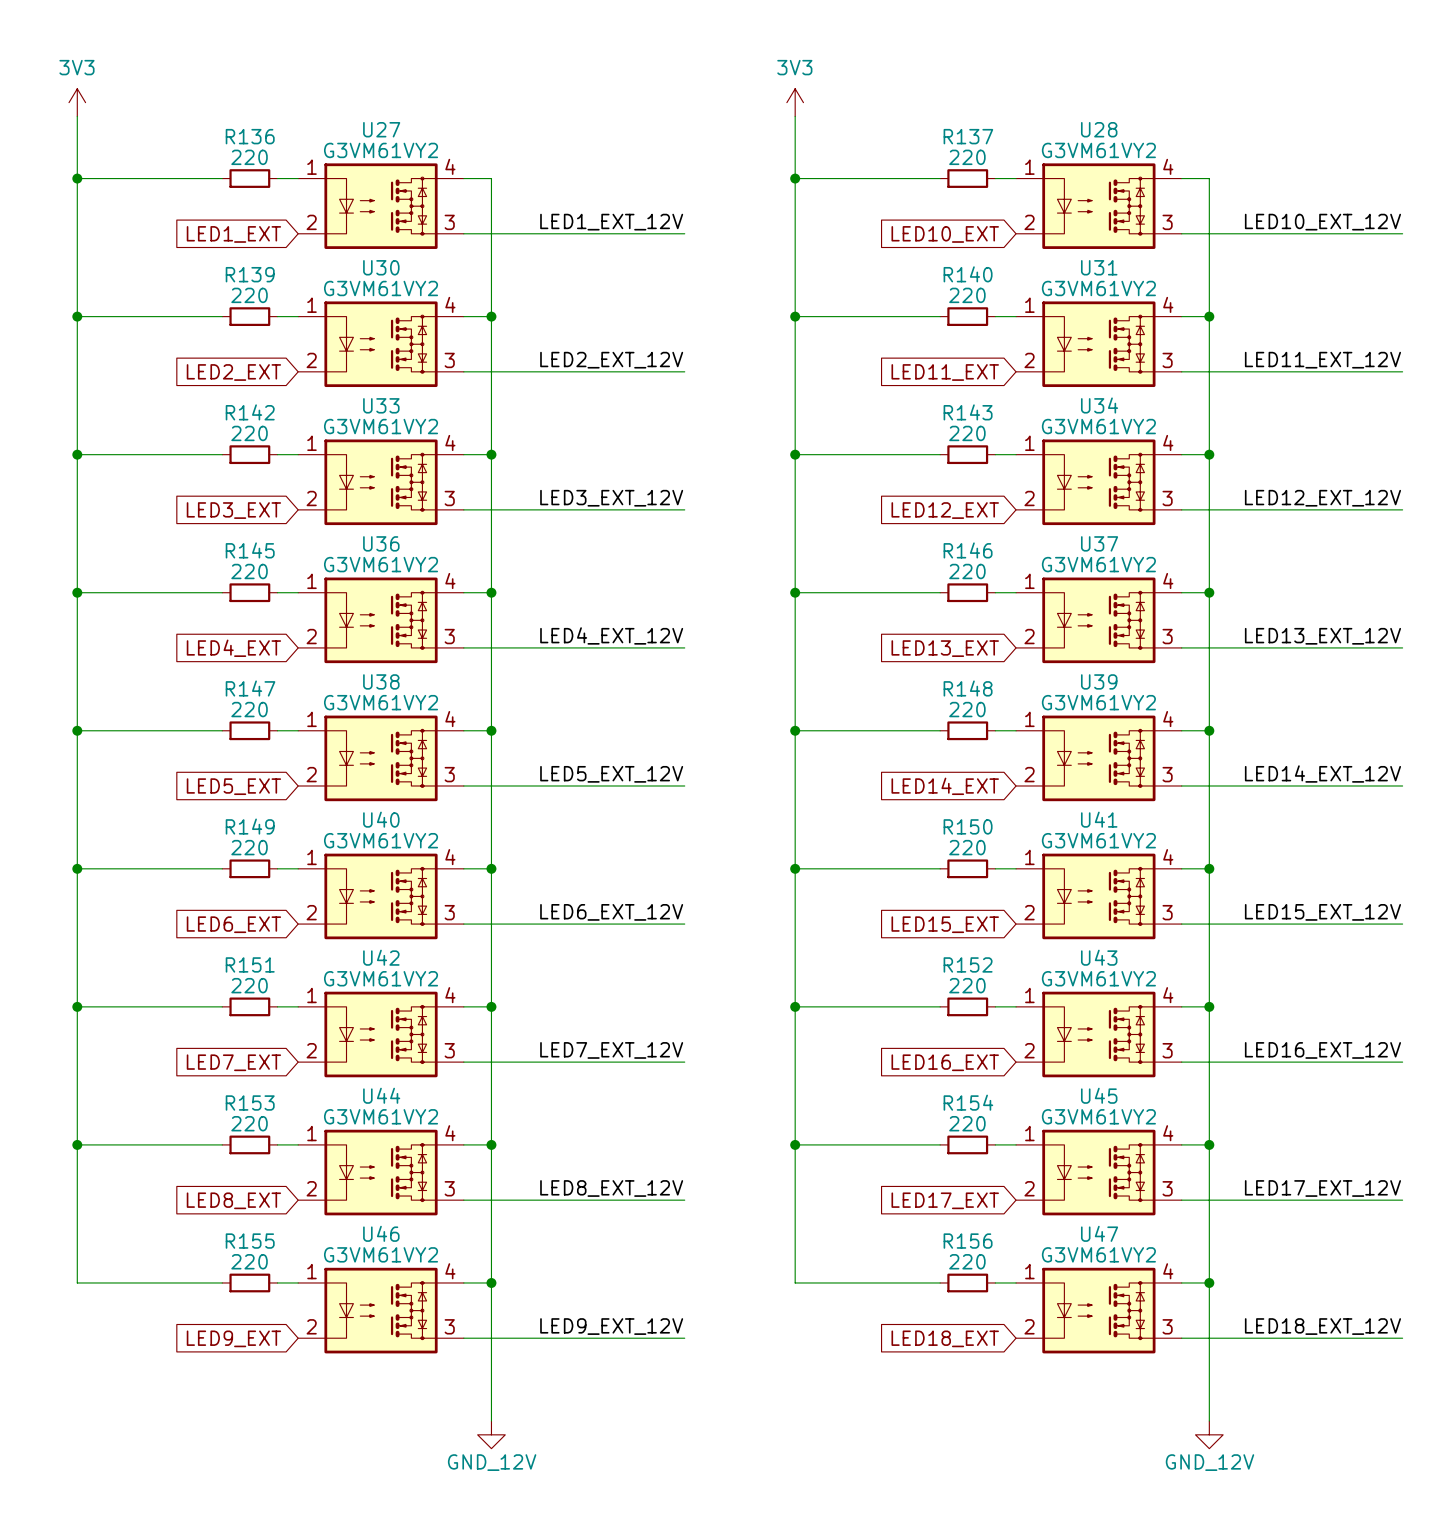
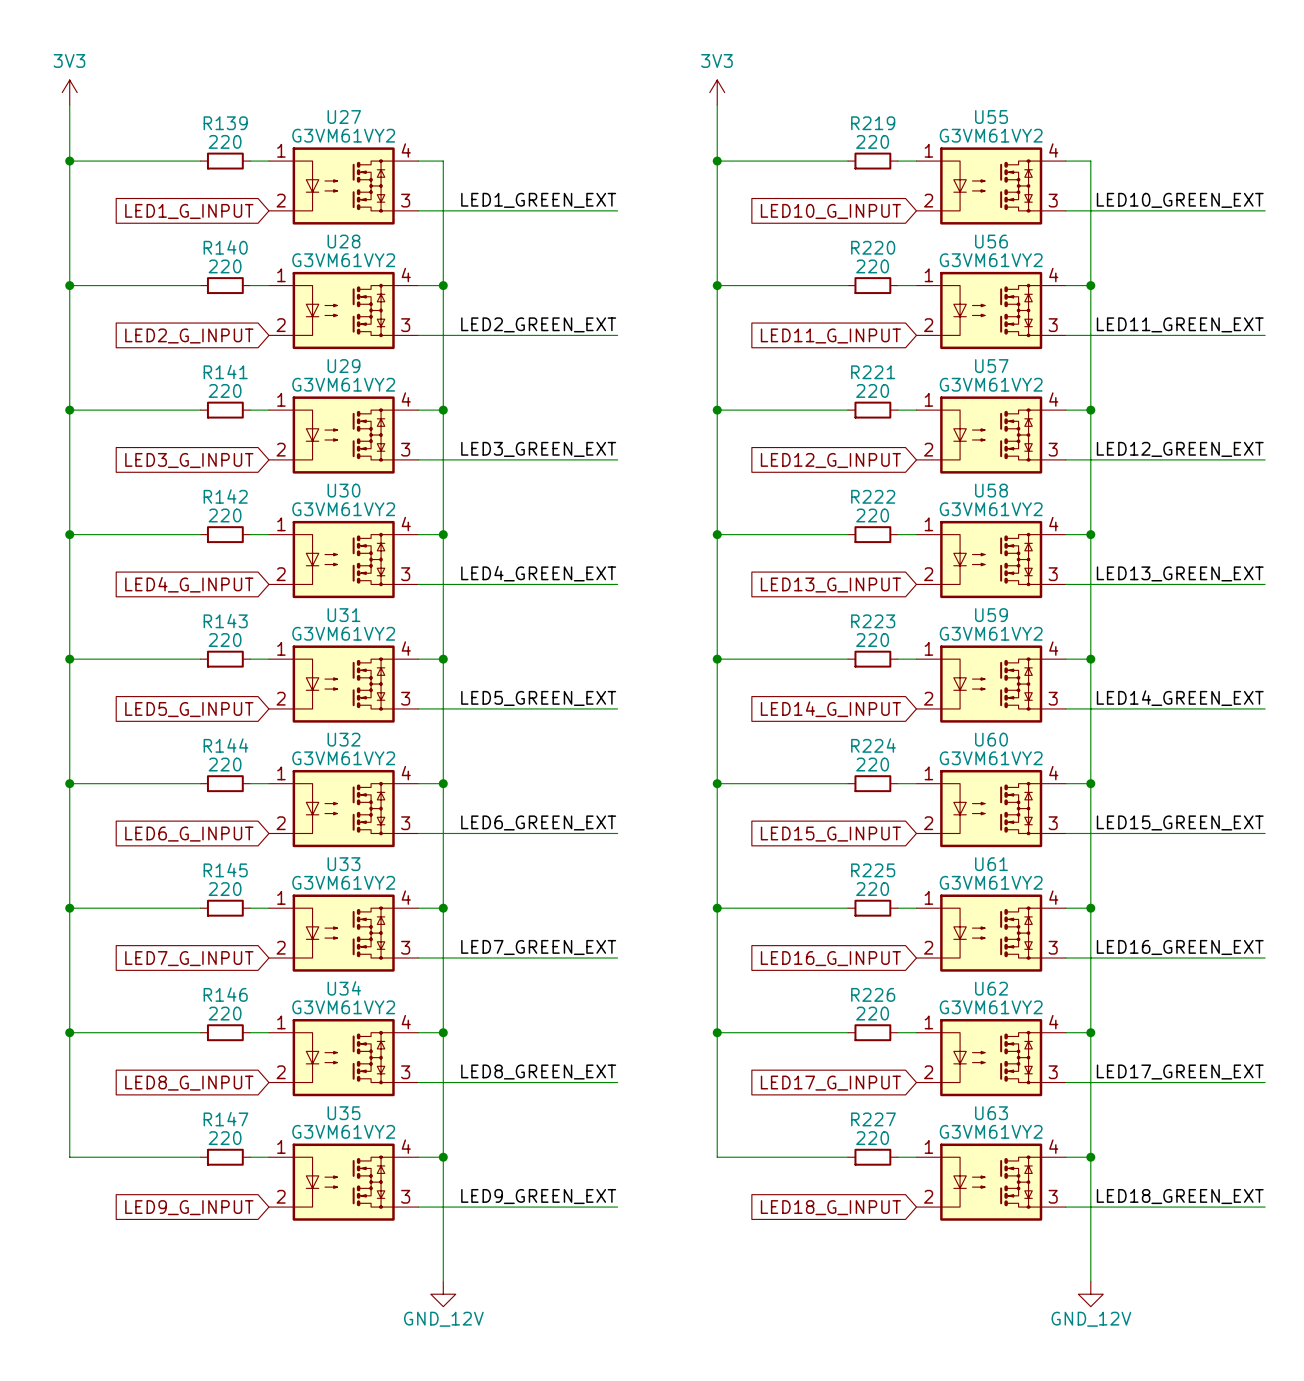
U28 name: U28 (1099, 129) -> U55 (991, 117)
R136 name: R136 (250, 136) -> R139 (225, 123)
R137 name: R137 (968, 136) -> R219 (873, 123)
label: LED1_EXT_12V (611, 222) -> LED1_GREEN_EXT (538, 200)
label: LED10_EXT_12V (1322, 222) -> LED10_GREEN_EXT (1180, 200)
global label: LED1_EXT (233, 234) -> LED1_G_INPUT (189, 211)
global label: LED10_EXT (945, 234) -> LED10_G_INPUT (830, 211)
U30 name: U30 (381, 267) -> U28 (343, 241)
U31 name: U31 (1099, 267) -> U56 (991, 241)
R139 name: R139 (250, 274) -> R140 (225, 247)
R140 name: R140 (968, 274) -> R220 (873, 247)
label: LED2_EXT_12V (611, 360) -> LED2_GREEN_EXT (538, 324)
label: LED11_EXT_12V (1322, 360) -> LED11_GREEN_EXT (1180, 324)
global label: LED2_EXT (233, 372) -> LED2_G_INPUT (189, 335)
global label: LED11_EXT (945, 372) -> LED11_G_INPUT (830, 335)
U33 name: U33 (381, 405) -> U29 (343, 366)
U34 name: U34 (1099, 405) -> U57 (991, 366)
R142 name: R142 (250, 412) -> R141 (225, 371)
R143 name: R143 (968, 412) -> R221 (873, 372)
label: LED3_EXT_12V (611, 498) -> LED3_GREEN_EXT (538, 449)
label: LED12_EXT_12V (1322, 498) -> LED12_GREEN_EXT (1180, 449)
global label: LED3_EXT (233, 510) -> LED3_G_INPUT (189, 460)
global label: LED12_EXT (945, 510) -> LED12_G_INPUT (830, 460)
U36 name: U36 (381, 543) -> U30 (343, 490)
U37 name: U37 (1099, 543) -> U58 (991, 490)
R145 name: R145 (250, 550) -> R142 (225, 496)
R146 name: R146 (968, 550) -> R222 (873, 496)
label: LED4_EXT_12V (611, 635) -> LED4_GREEN_EXT (538, 573)
label: LED13_EXT_12V (1322, 636) -> LED13_GREEN_EXT (1180, 573)
global label: LED4_EXT (233, 648) -> LED4_G_INPUT (189, 584)
global label: LED13_EXT (945, 648) -> LED13_G_INPUT (830, 585)
U38 name: U38 (381, 681) -> U31 (343, 615)
U39 name: U39 (1099, 681) -> U59 (991, 615)
R147 name: R147 (250, 688) -> R143 (225, 621)
R148 name: R148 (968, 688) -> R223 (873, 621)
label: LED5_EXT_12V (611, 774) -> LED5_GREEN_EXT (538, 698)
label: LED14_EXT_12V (1322, 774) -> LED14_GREEN_EXT (1180, 698)
global label: LED5_EXT (233, 786) -> LED5_G_INPUT (189, 709)
global label: LED14_EXT (945, 786) -> LED14_G_INPUT (830, 709)
U40 name: U40 (381, 819) -> U32 (343, 739)
U41 name: U41 (1099, 819) -> U60 (991, 739)
R149 name: R149 (250, 826) -> R144 (225, 745)
R150 name: R150 (968, 826) -> R224 (873, 745)
label: LED6_EXT_12V (611, 912) -> LED6_GREEN_EXT (538, 822)
label: LED15_EXT_12V (1322, 912) -> LED15_GREEN_EXT (1180, 822)
global label: LED6_EXT (233, 924) -> LED6_G_INPUT (189, 834)
global label: LED15_EXT (945, 924) -> LED15_G_INPUT (830, 834)
U42 name: U42 (381, 957) -> U33 (343, 864)
U43 name: U43 (1099, 957) -> U61 (991, 864)
R151 name: R151 (250, 964) -> R145 (225, 870)
R152 name: R152 (968, 964) -> R225 (873, 870)
label: LED7_EXT_12V (611, 1050) -> LED7_GREEN_EXT (538, 947)
label: LED16_EXT_12V (1322, 1050) -> LED16_GREEN_EXT (1180, 947)
global label: LED7_EXT (233, 1062) -> LED7_G_INPUT (189, 958)
global label: LED16_EXT (945, 1062) -> LED16_G_INPUT (830, 958)
U44 name: U44 (381, 1095) -> U34 (344, 988)
U45 name: U45 (1099, 1095) -> U62 (991, 988)
R154 name: R154 (968, 1102) -> R226 (873, 994)
R153 name: R153 (250, 1103) -> R146 (225, 994)
label: LED8_EXT_12V (611, 1188) -> LED8_GREEN_EXT (538, 1072)
label: LED17_EXT_12V (1322, 1188) -> LED17_GREEN_EXT (1180, 1072)
global label: LED8_EXT (233, 1200) -> LED8_G_INPUT (189, 1083)
global label: LED17_EXT (945, 1200) -> LED17_G_INPUT (830, 1083)
U46 name: U46 (381, 1233) -> U35 (343, 1113)
U47 name: U47 (1099, 1233) -> U63 (991, 1113)
R155 name: R155 (250, 1241) -> R147 (225, 1119)
R156 name: R156 (968, 1241) -> R227 (873, 1119)
label: LED9_EXT_12V (611, 1326) -> LED9_GREEN_EXT (538, 1196)
label: LED18_EXT_12V (1322, 1326) -> LED18_GREEN_EXT (1180, 1196)
global label: LED9_EXT (233, 1338) -> LED9_G_INPUT (189, 1207)
global label: LED18_EXT (945, 1338) -> LED18_G_INPUT (830, 1207)

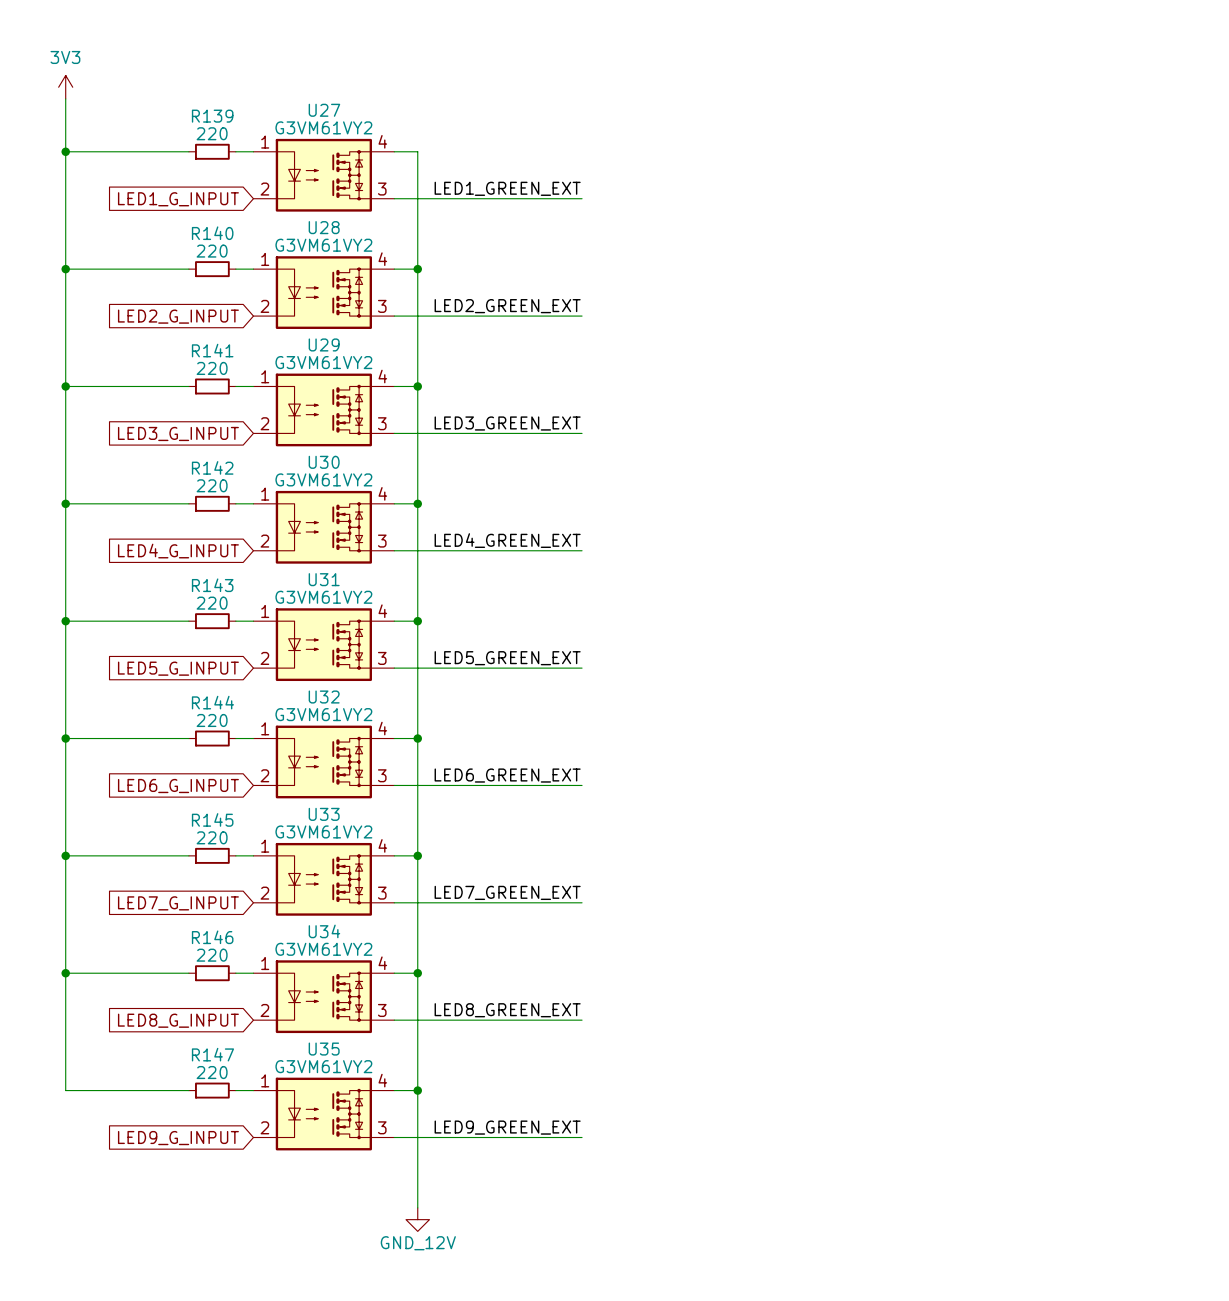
power symbol: 3V3 (717, 92) -> none
wire: (717, 105) (717, 1157) (847, 1157) -> none
wire: (717, 161) (847, 161) -> none
junction: (717, 161) -> none
R219: 220 (872, 161) -> none
wire: (897, 161) (916, 161) -> none
wire: (1065, 161) (1090, 161) (1090, 1281) -> none
U55: G3VM61VY2 (991, 185) -> none
label: LED10_GREEN_EXT (1180, 200) -> none
wire: (1065, 210) (1265, 210) -> none
global label: LED10_G_INPUT (830, 211) -> none
wire: (717, 285) (847, 285) -> none
junction: (717, 285) -> none
R220: 220 (872, 285) -> none
wire: (897, 285) (916, 285) -> none
wire: (1065, 285) (1090, 285) -> none
junction: (1090, 285) -> none
U56: G3VM61VY2 (991, 310) -> none
label: LED11_GREEN_EXT (1180, 324) -> none
global label: LED11_G_INPUT (830, 335) -> none
wire: (1065, 335) (1265, 335) -> none
wire: (717, 410) (847, 410) -> none
junction: (717, 410) -> none
R221: 220 (872, 410) -> none
wire: (897, 410) (916, 410) -> none
wire: (1065, 410) (1090, 410) -> none
junction: (1090, 410) -> none
U57: G3VM61VY2 (991, 435) -> none
label: LED12_GREEN_EXT (1180, 449) -> none
wire: (1065, 459) (1265, 459) -> none
global label: LED12_G_INPUT (830, 460) -> none
wire: (717, 534) (847, 534) -> none
junction: (717, 534) -> none
R222: 220 (872, 534) -> none
wire: (897, 534) (916, 534) -> none
wire: (1065, 534) (1090, 534) -> none
junction: (1090, 534) -> none
U58: G3VM61VY2 (991, 559) -> none
label: LED13_GREEN_EXT (1180, 573) -> none
wire: (1065, 584) (1265, 584) -> none
global label: LED13_G_INPUT (830, 585) -> none
wire: (717, 659) (847, 659) -> none
junction: (717, 659) -> none
R223: 220 (872, 659) -> none
wire: (897, 659) (916, 659) -> none
wire: (1065, 659) (1090, 659) -> none
junction: (1090, 659) -> none
U59: G3VM61VY2 (991, 684) -> none
label: LED14_GREEN_EXT (1180, 698) -> none
wire: (1065, 708) (1265, 708) -> none
global label: LED14_G_INPUT (830, 709) -> none
wire: (717, 783) (847, 783) -> none
junction: (717, 783) -> none
R224: 220 (872, 783) -> none
wire: (897, 783) (916, 783) -> none
wire: (1065, 783) (1090, 783) -> none
junction: (1090, 783) -> none
U60: G3VM61VY2 (991, 808) -> none
label: LED15_GREEN_EXT (1180, 822) -> none
wire: (1065, 833) (1265, 833) -> none
global label: LED15_G_INPUT (830, 834) -> none
wire: (717, 908) (847, 908) -> none
junction: (717, 908) -> none
R225: 220 (872, 908) -> none
wire: (897, 908) (916, 908) -> none
wire: (1065, 908) (1090, 908) -> none
junction: (1090, 908) -> none
U61: G3VM61VY2 (991, 933) -> none
label: LED16_GREEN_EXT (1180, 947) -> none
global label: LED16_G_INPUT (830, 958) -> none
wire: (1065, 958) (1265, 958) -> none
wire: (717, 1032) (847, 1032) -> none
junction: (717, 1032) -> none
R226: 220 (872, 1032) -> none
wire: (897, 1032) (916, 1032) -> none
wire: (1065, 1032) (1090, 1032) -> none
junction: (1090, 1032) -> none
U62: G3VM61VY2 (991, 1057) -> none
label: LED17_GREEN_EXT (1180, 1072) -> none
wire: (1065, 1082) (1265, 1082) -> none
global label: LED17_G_INPUT (830, 1083) -> none
R227: 220 (872, 1157) -> none
wire: (897, 1157) (916, 1157) -> none
wire: (1065, 1157) (1090, 1157) -> none
junction: (1090, 1157) -> none
U63: G3VM61VY2 (991, 1182) -> none
label: LED18_GREEN_EXT (1180, 1196) -> none
global label: LED18_G_INPUT (830, 1207) -> none
wire: (1065, 1207) (1265, 1207) -> none
power symbol: GND_12V (1090, 1294) -> none

